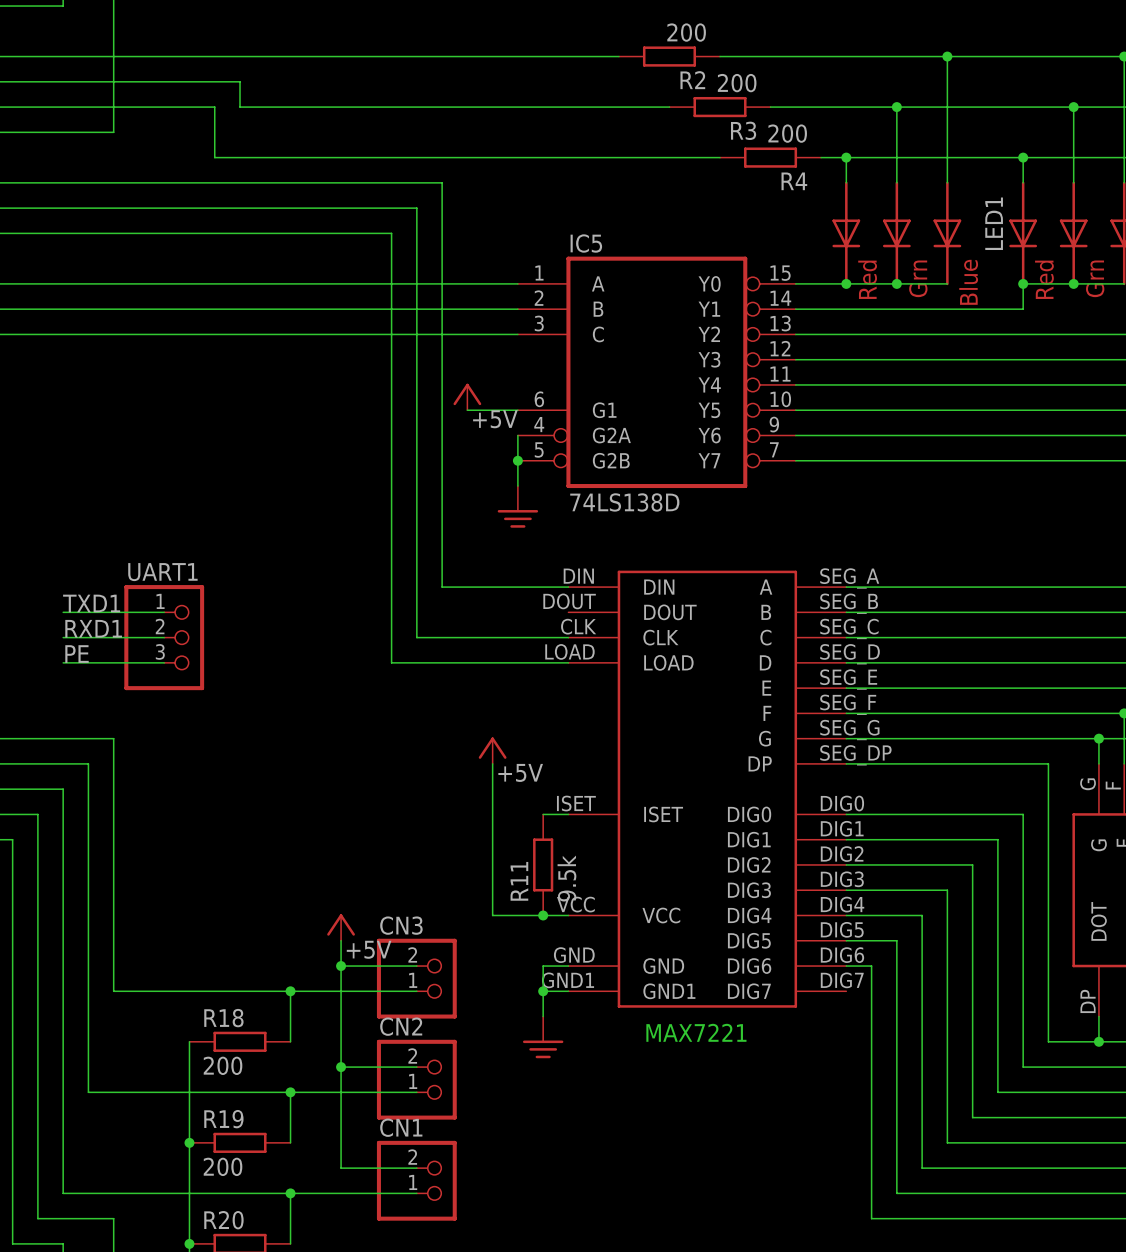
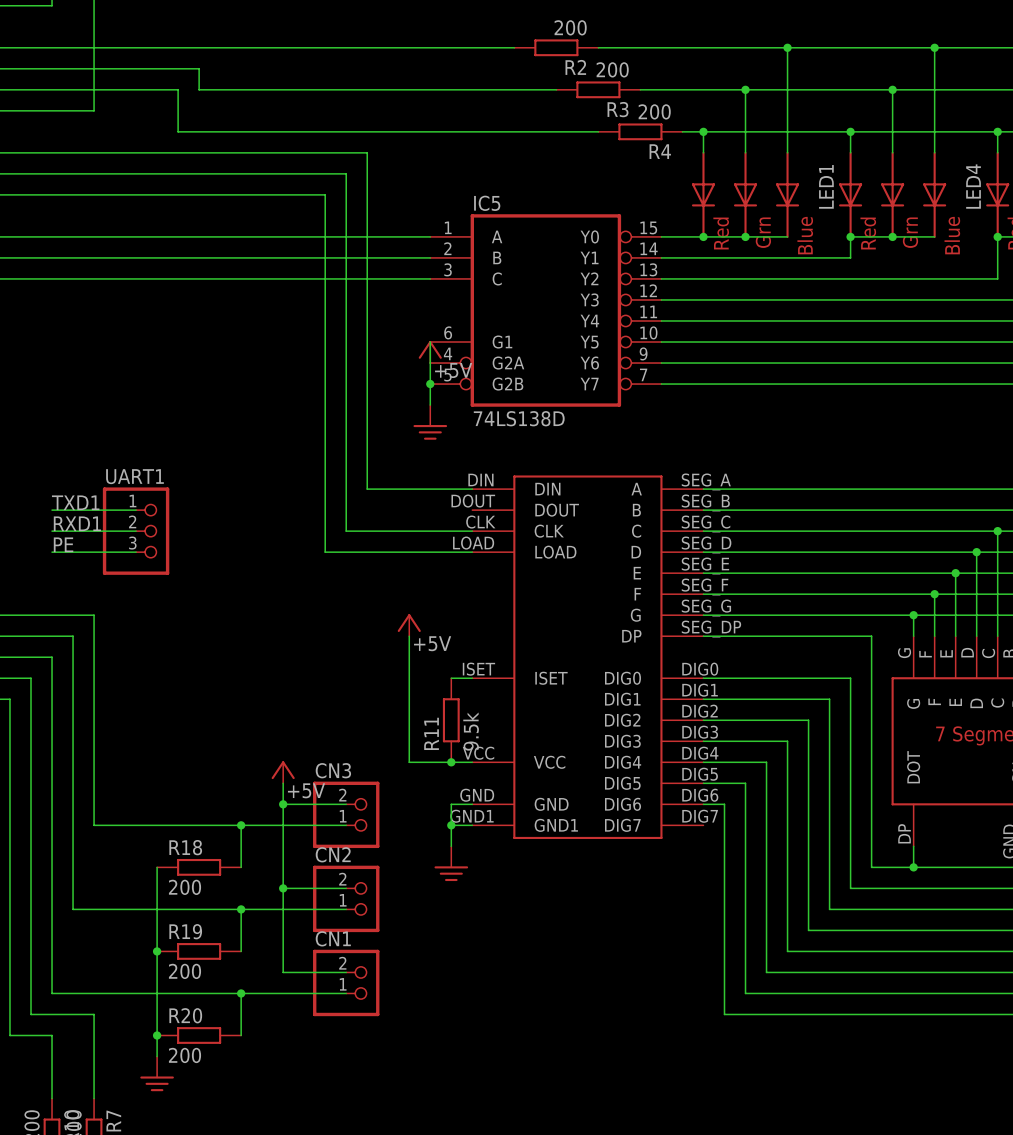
power symbol position: +5V (467, 396) -> +5V (430, 351)
wire: (467, 410) (517, 410) -> (430, 363) (430, 342)
text: MAX7221 (696, 1032) -> none

